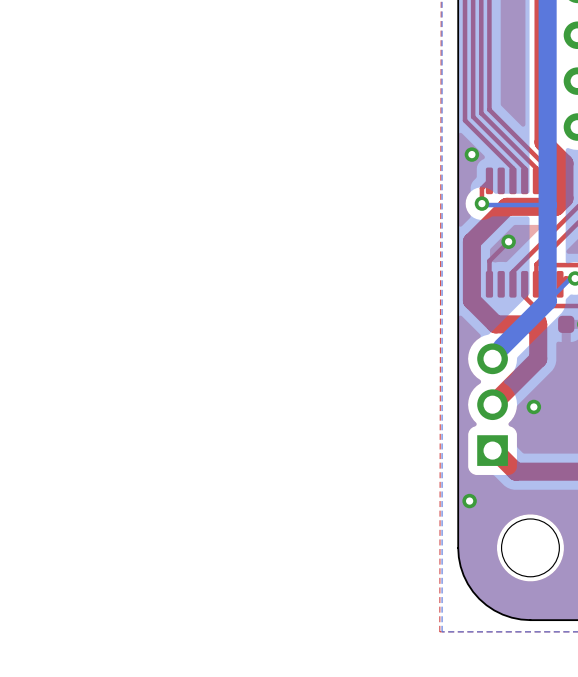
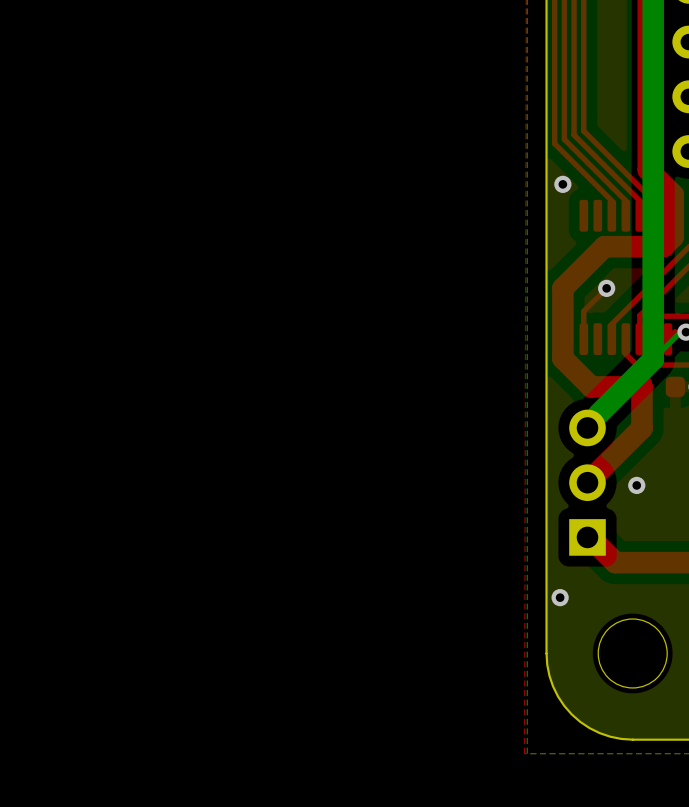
top track: (489, 180) (481, 188) (481, 203) -> none
bottom track: (481, 203) (547, 205) -> none
via: (481, 203) -> none

